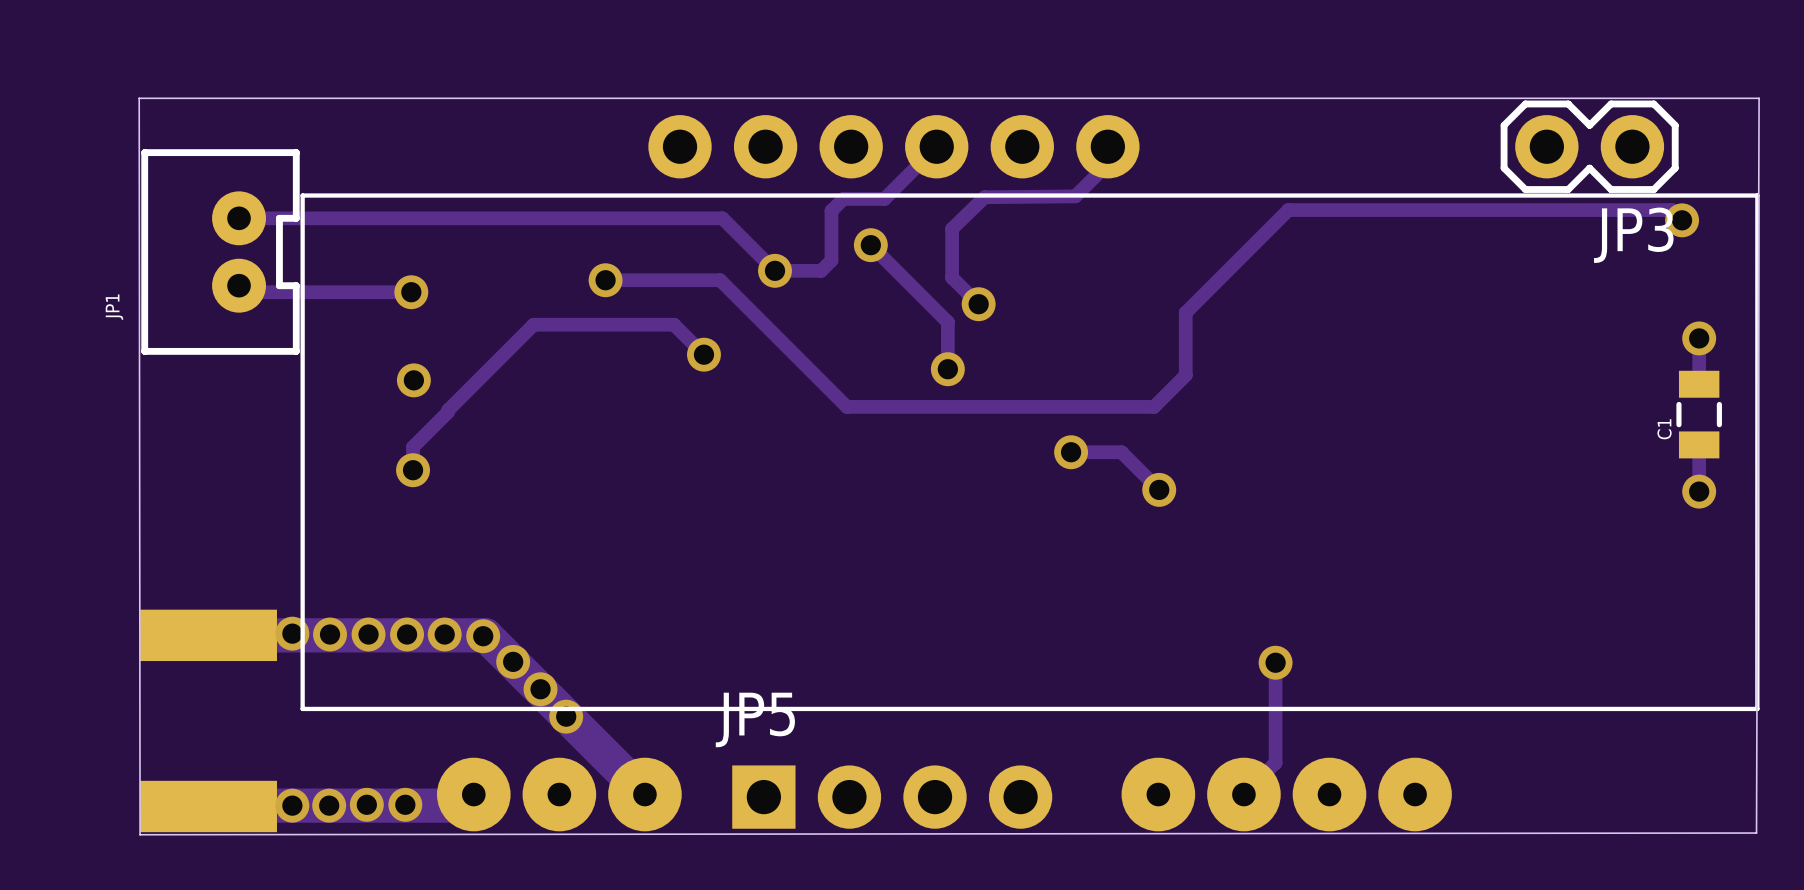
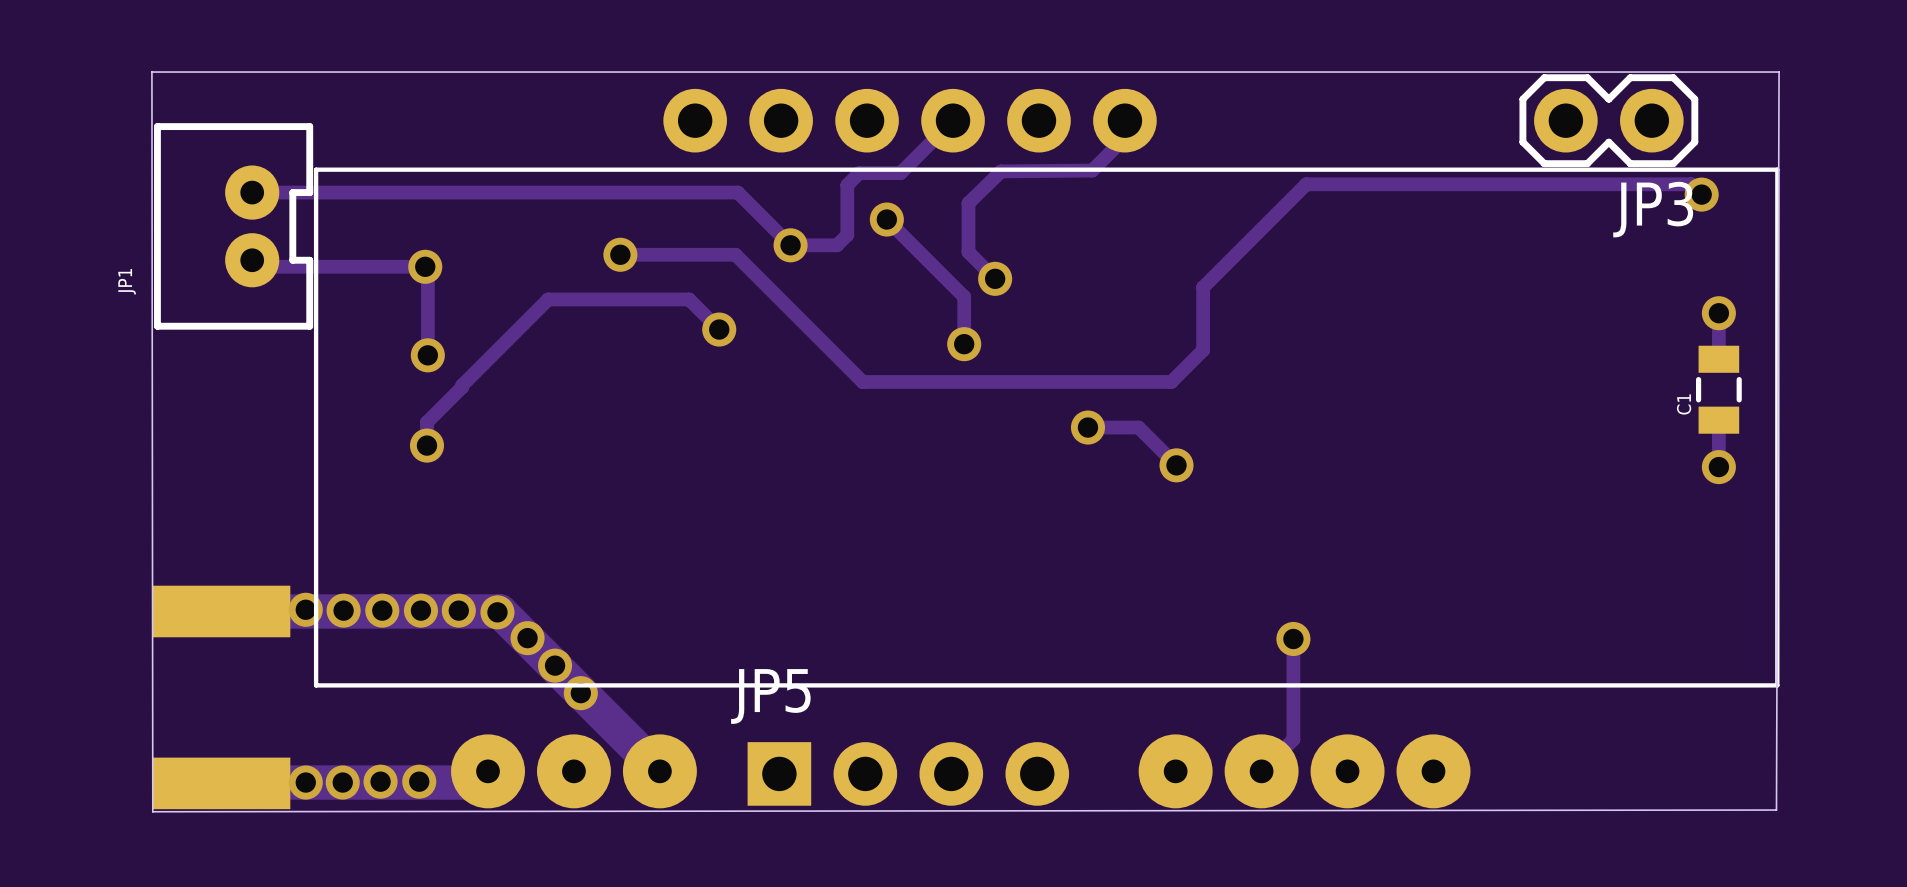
track: none -> (425, 266) (427, 269) (427, 355)

